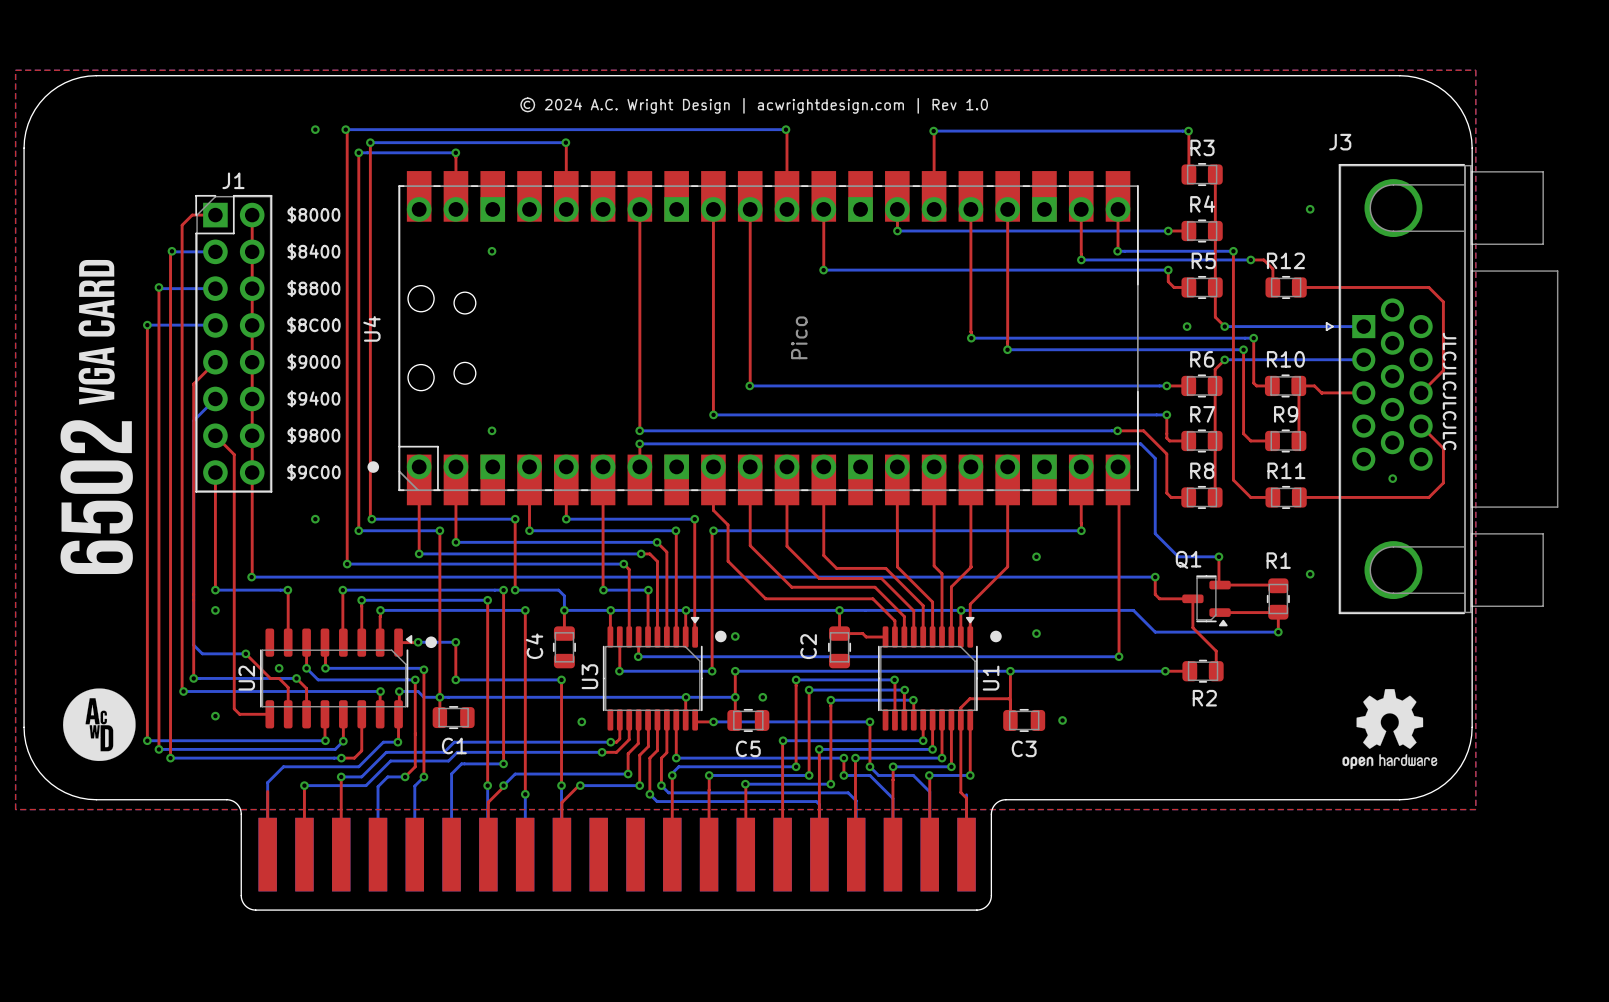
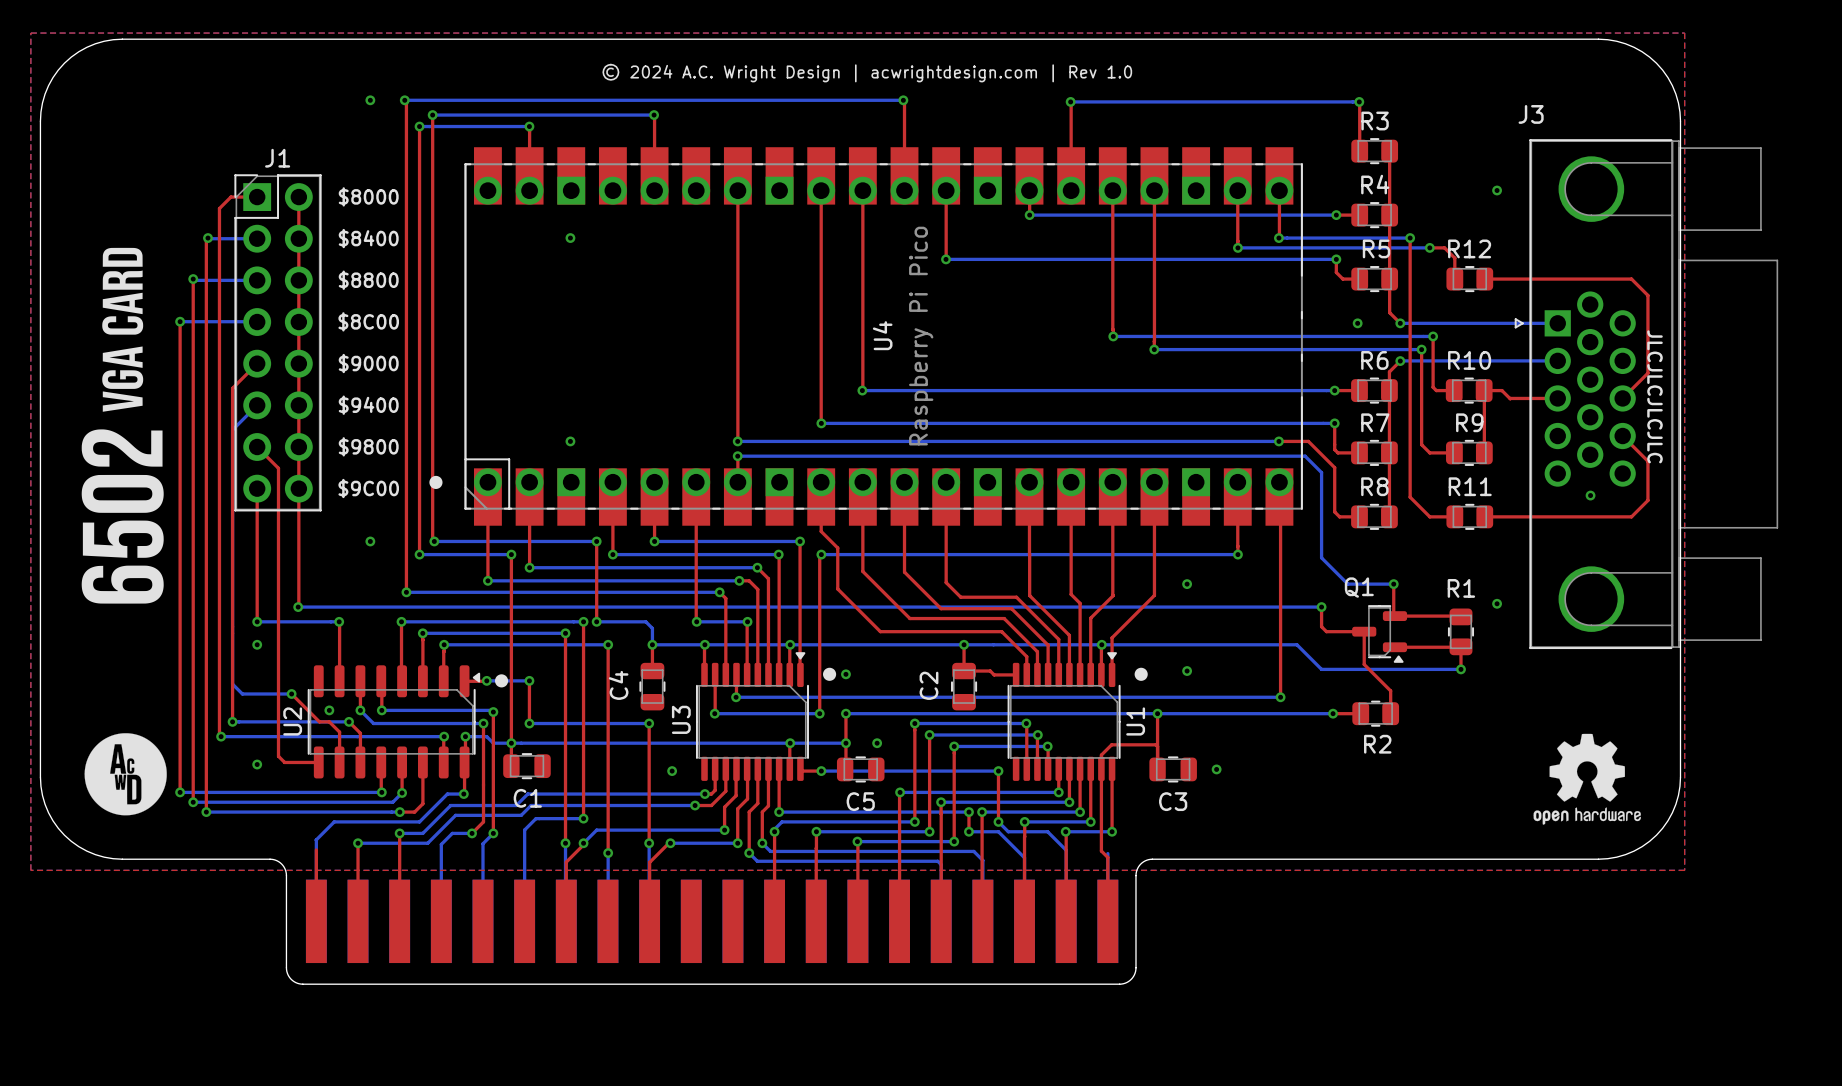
U4 footprint: [398, 171, 1139, 506] -> [464, 147, 1303, 526]
U4 name position: U4 (371, 328) -> U4 (882, 335)
U4 value: Pico (799, 337) -> Raspberry Pi Pico (921, 336)

